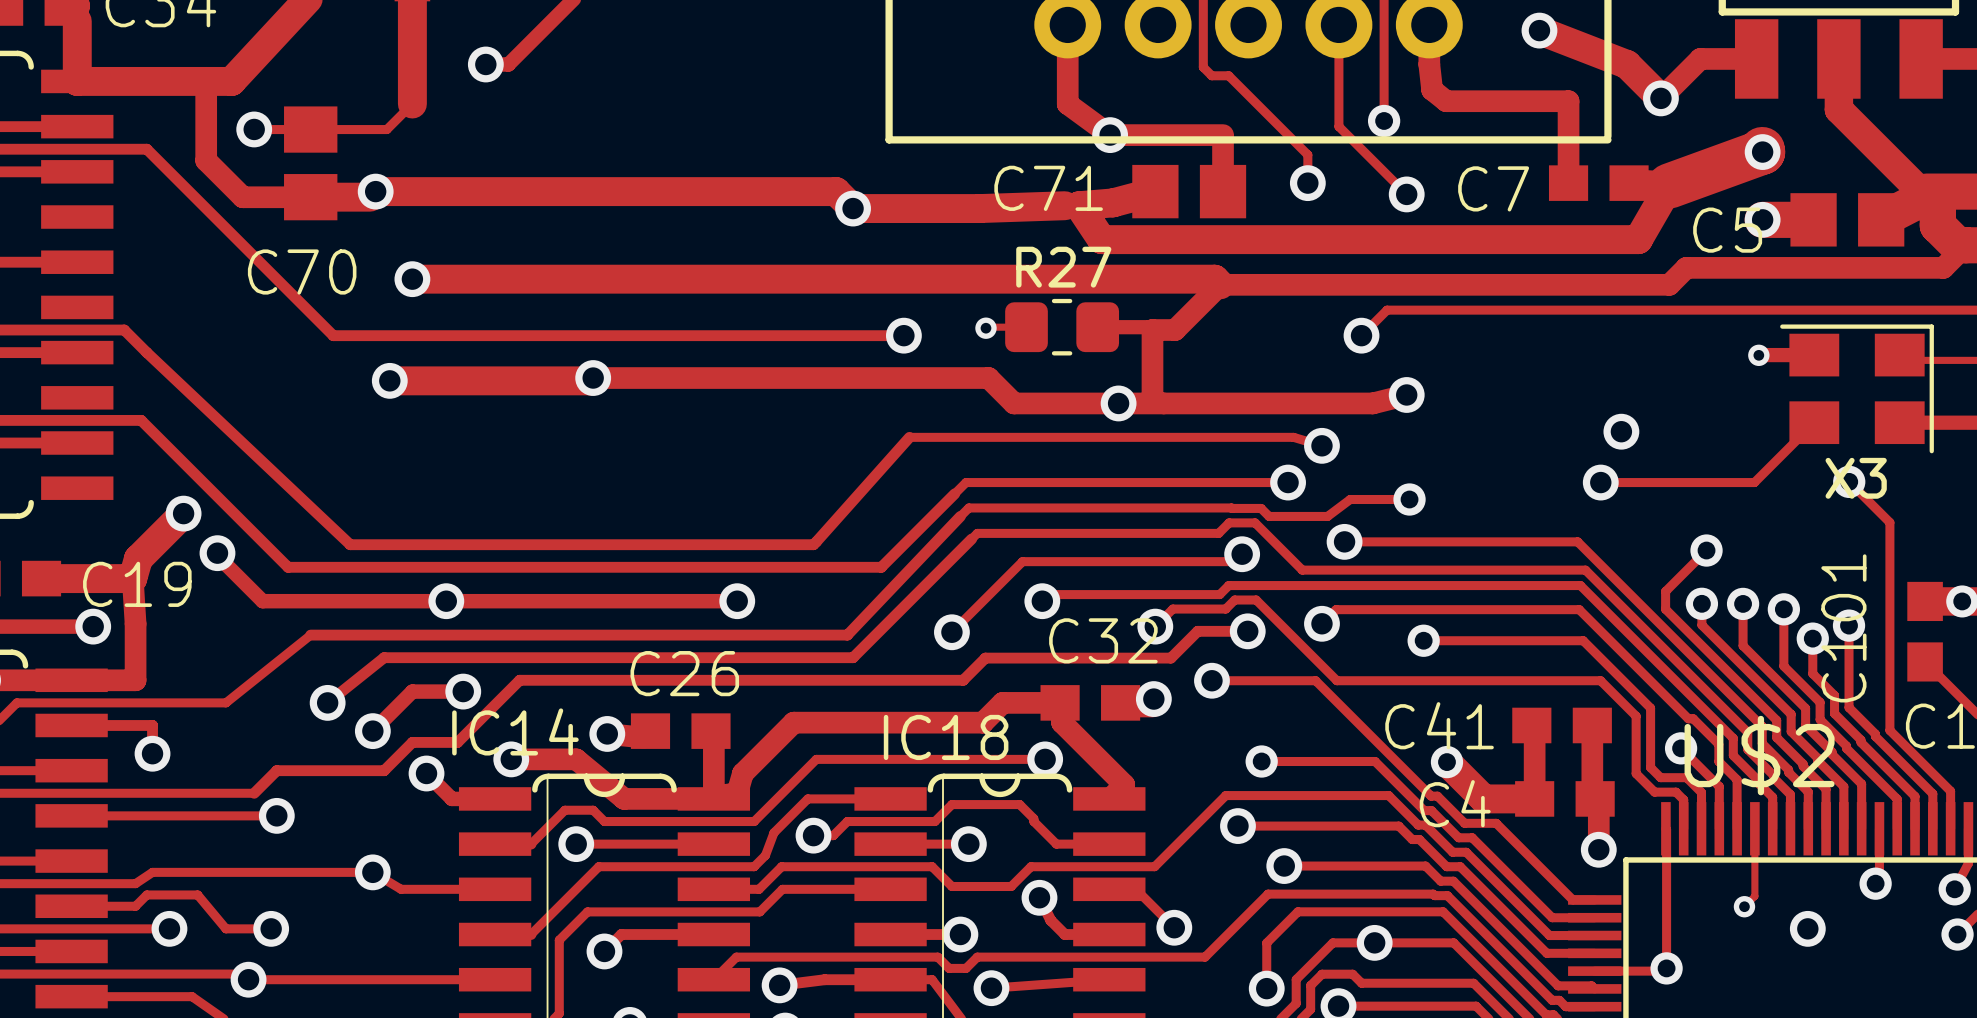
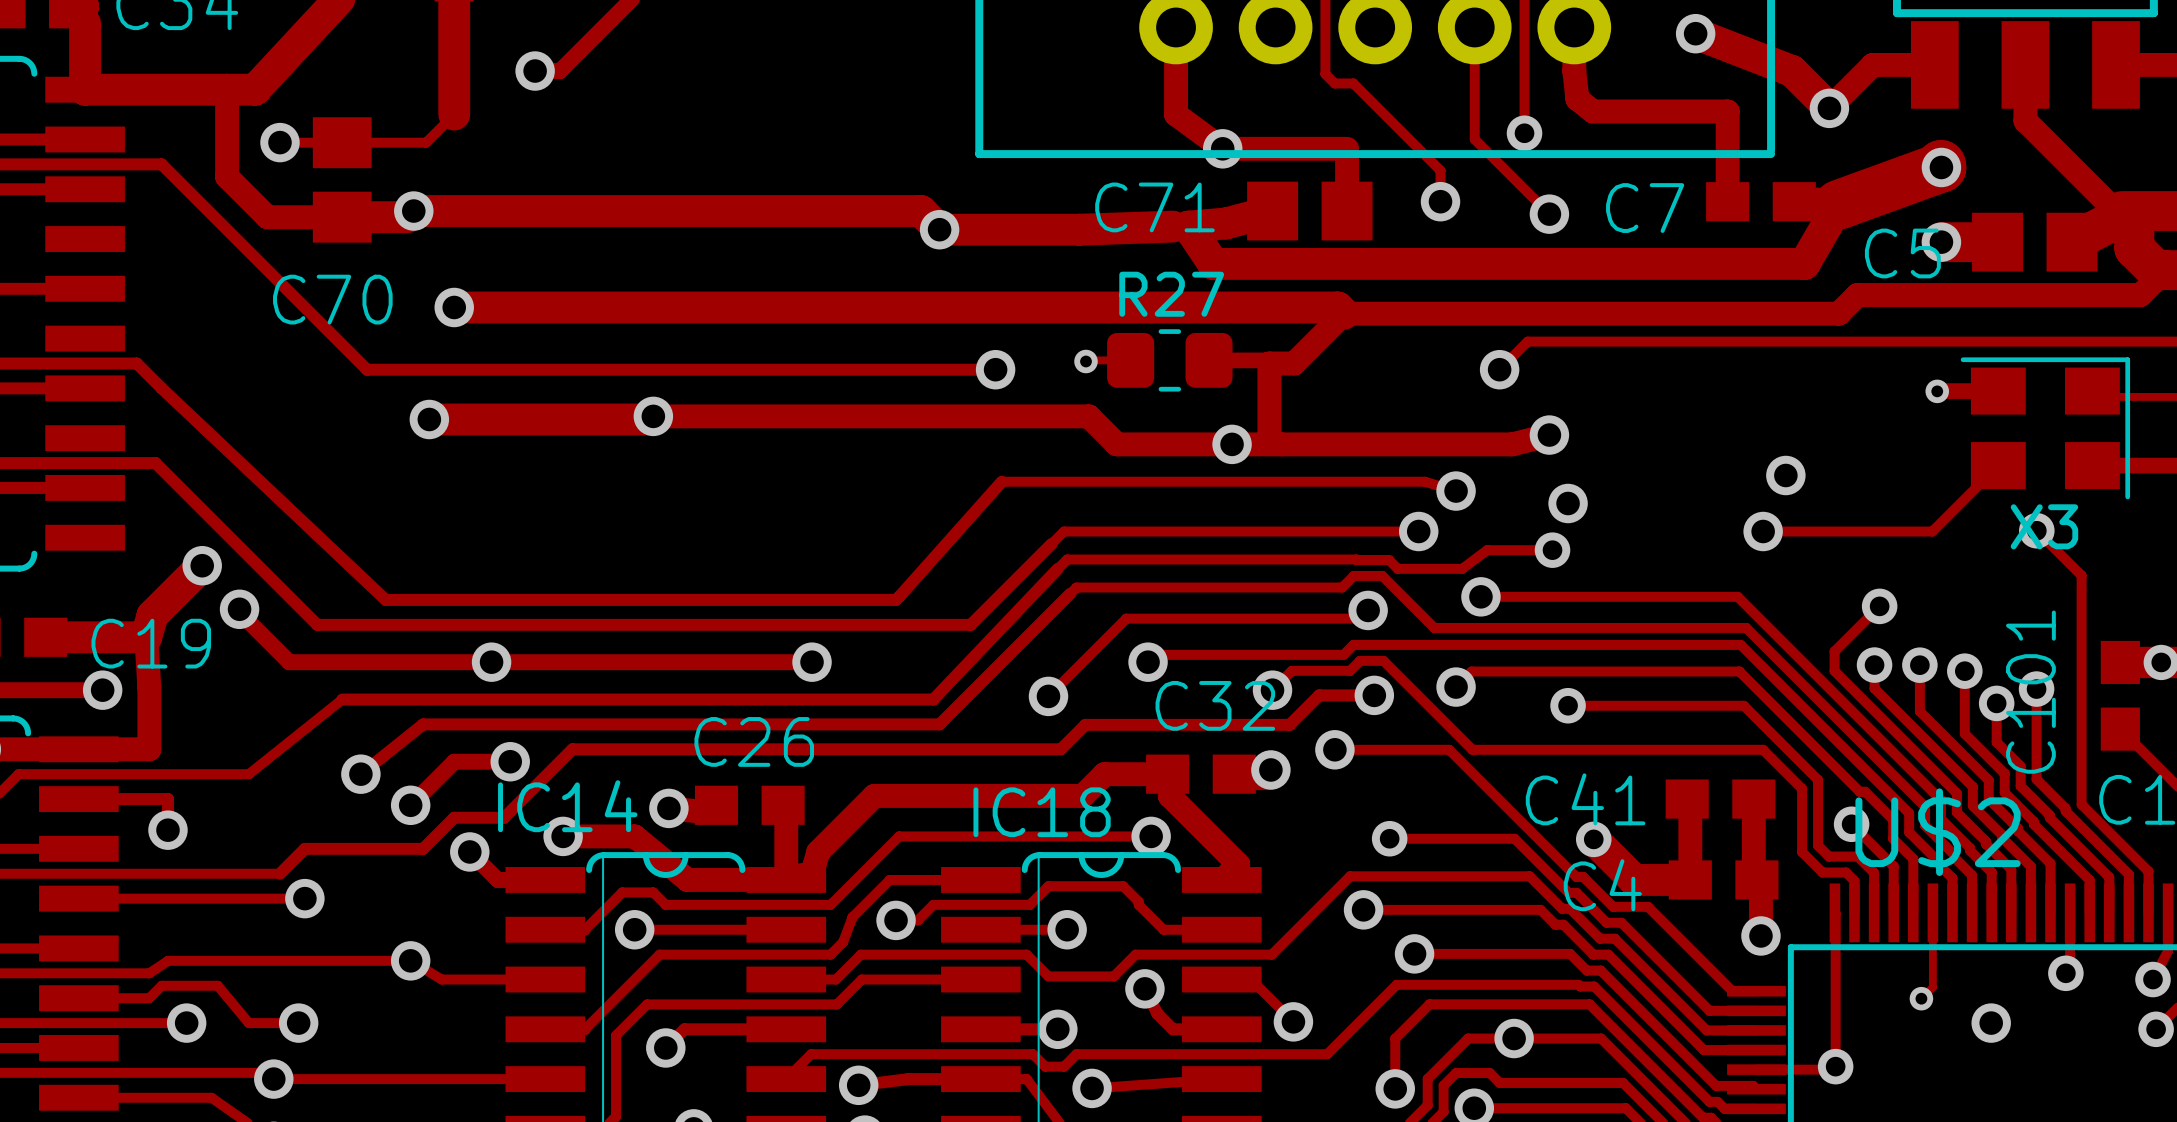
track width: thick (1838, 58) (1838, 109) (1923, 194) -> thin (2025, 64) (2025, 120) (2118, 214)
via: none -> (1568, 503)

